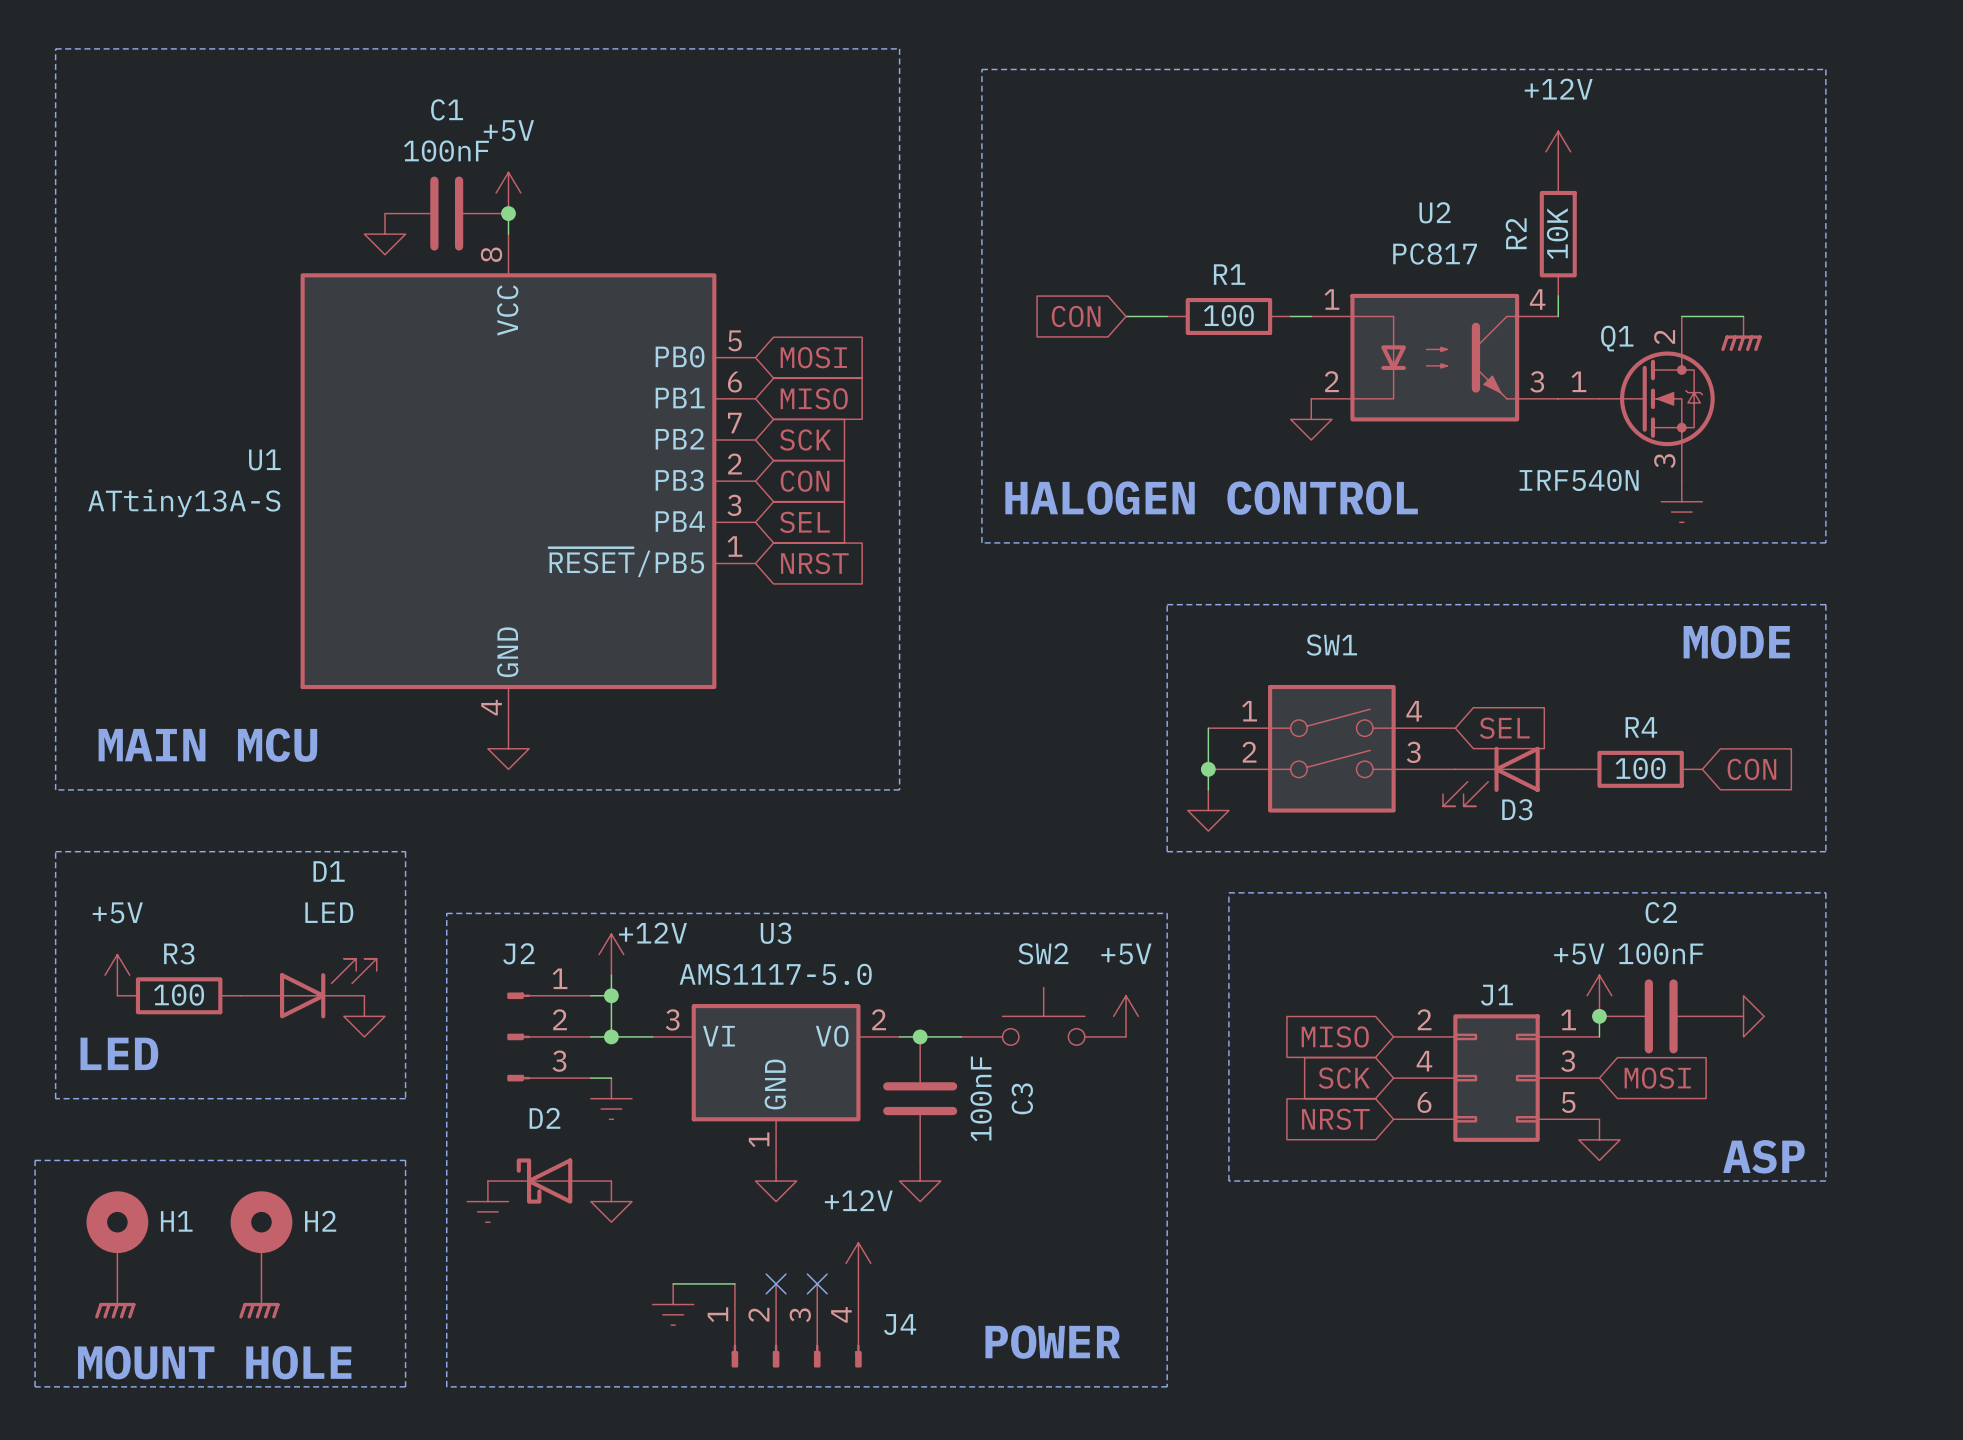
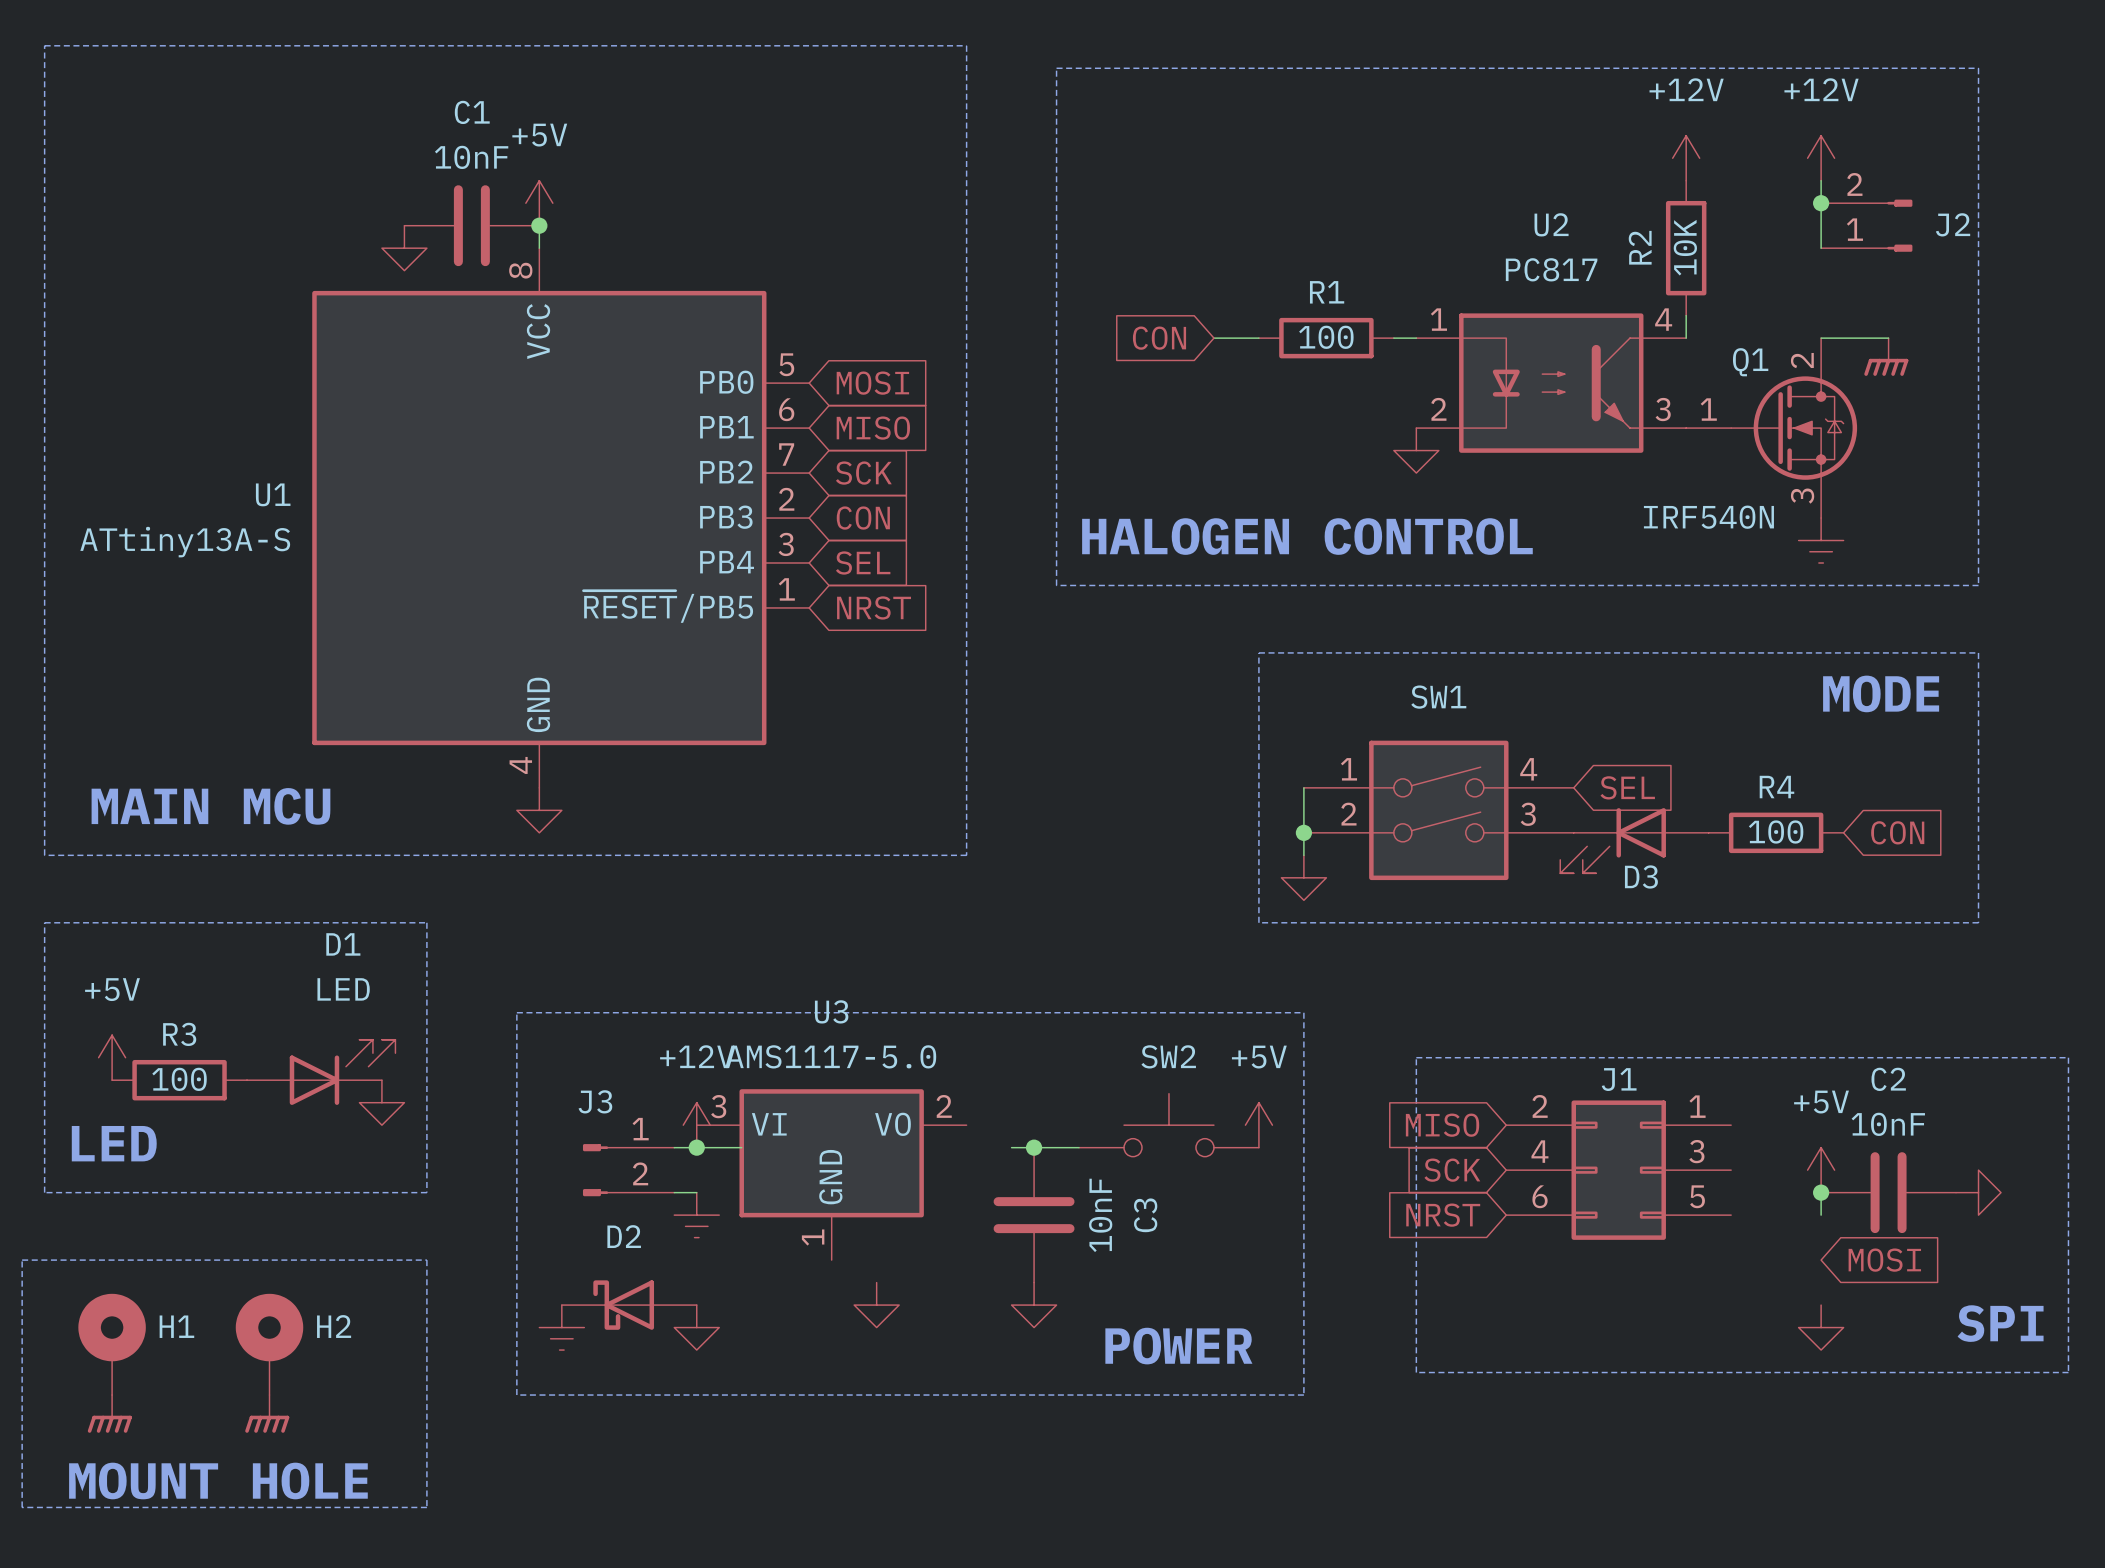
C1 value: 100nF (446, 151) -> 10nF (471, 157)
power symbol: none -> +12V (1821, 158)
wire: none -> (1821, 180) (1821, 248)
junction: none -> (1821, 203)
line: (1228, 892) (1825, 892) (1825, 1181) (1228, 1181) (1228, 892) -> (1416, 1057) (2068, 1057) (2068, 1372) (1416, 1372) (1416, 1057)
line: (446, 913) (1167, 913) (1167, 1386) (446, 1386) (446, 913) -> (516, 1012) (516, 1395) (1303, 1395) (1303, 1012) (516, 1012)
power symbol text position: +12V (652, 933) -> +12V (697, 1056)
J2 name position: J2 (518, 953) -> J2 (1953, 224)
C2 value: 100nF (1660, 953) -> 10nF (1888, 1124)
power symbol position: +12V (611, 954) -> +12V (696, 1125)
power symbol text position: +5V (1579, 954) -> +5V (1821, 1102)
wire: (611, 975) (611, 1036) -> none
J2 symbol: [507, 992, 591, 1082] -> [1821, 199, 1913, 252]
wire: (590, 995) (611, 995) -> none
junction: (611, 995) -> none
power symbol position: +5V (1599, 995) -> +5V (1821, 1170)
SW2 position: (1043, 1016) -> (1168, 1125)
power symbol position: +5V (1126, 1016) -> +5V (1258, 1125)
wire: (1599, 1016) (1599, 1036) -> (1821, 1192) (1821, 1215)
junction: (1599, 1016) -> none
C2 position: (1661, 1016) -> (1888, 1192)
power symbol: (1743, 1016) -> none
wire: (590, 1036) (652, 1036) -> (674, 1147) (741, 1147)
junction: (611, 1036) -> none
wire: (899, 1036) (961, 1036) -> (1011, 1147) (1079, 1147)
junction position: (920, 1036) -> (1034, 1147)
junction: none -> (696, 1147)
wire: (590, 1078) (611, 1078) -> (674, 1192) (696, 1192)
J3: none -> (628, 1170)
global label position: MOSI (1657, 1078) -> MOSI (1884, 1260)
power symbol position: (611, 1098) -> (696, 1215)
C3 position: (920, 1098) -> (1034, 1215)
C3 value: 100nF (981, 1098) -> 10nF (1100, 1215)
junction: none -> (1821, 1192)
power symbol: none -> (1978, 1192)
power symbol: (1599, 1139) -> none
text: ASP (1763, 1156) -> SPI (2000, 1323)
D2 position: (549, 1181) -> (629, 1305)
power symbol position: (776, 1181) -> (876, 1305)
power symbol position: (920, 1181) -> (1034, 1305)
power symbol position: (487, 1201) -> (561, 1327)
power symbol position: (611, 1201) -> (696, 1327)
power symbol: none -> (1821, 1327)
power symbol: +12V (858, 1263) -> none
no-connect mark: (776, 1283) -> none
no-connect mark: (817, 1283) -> none
power symbol: (673, 1304) -> none
J4: (796, 1325) -> none
text position: POWER (1052, 1342) -> POWER (1178, 1346)

